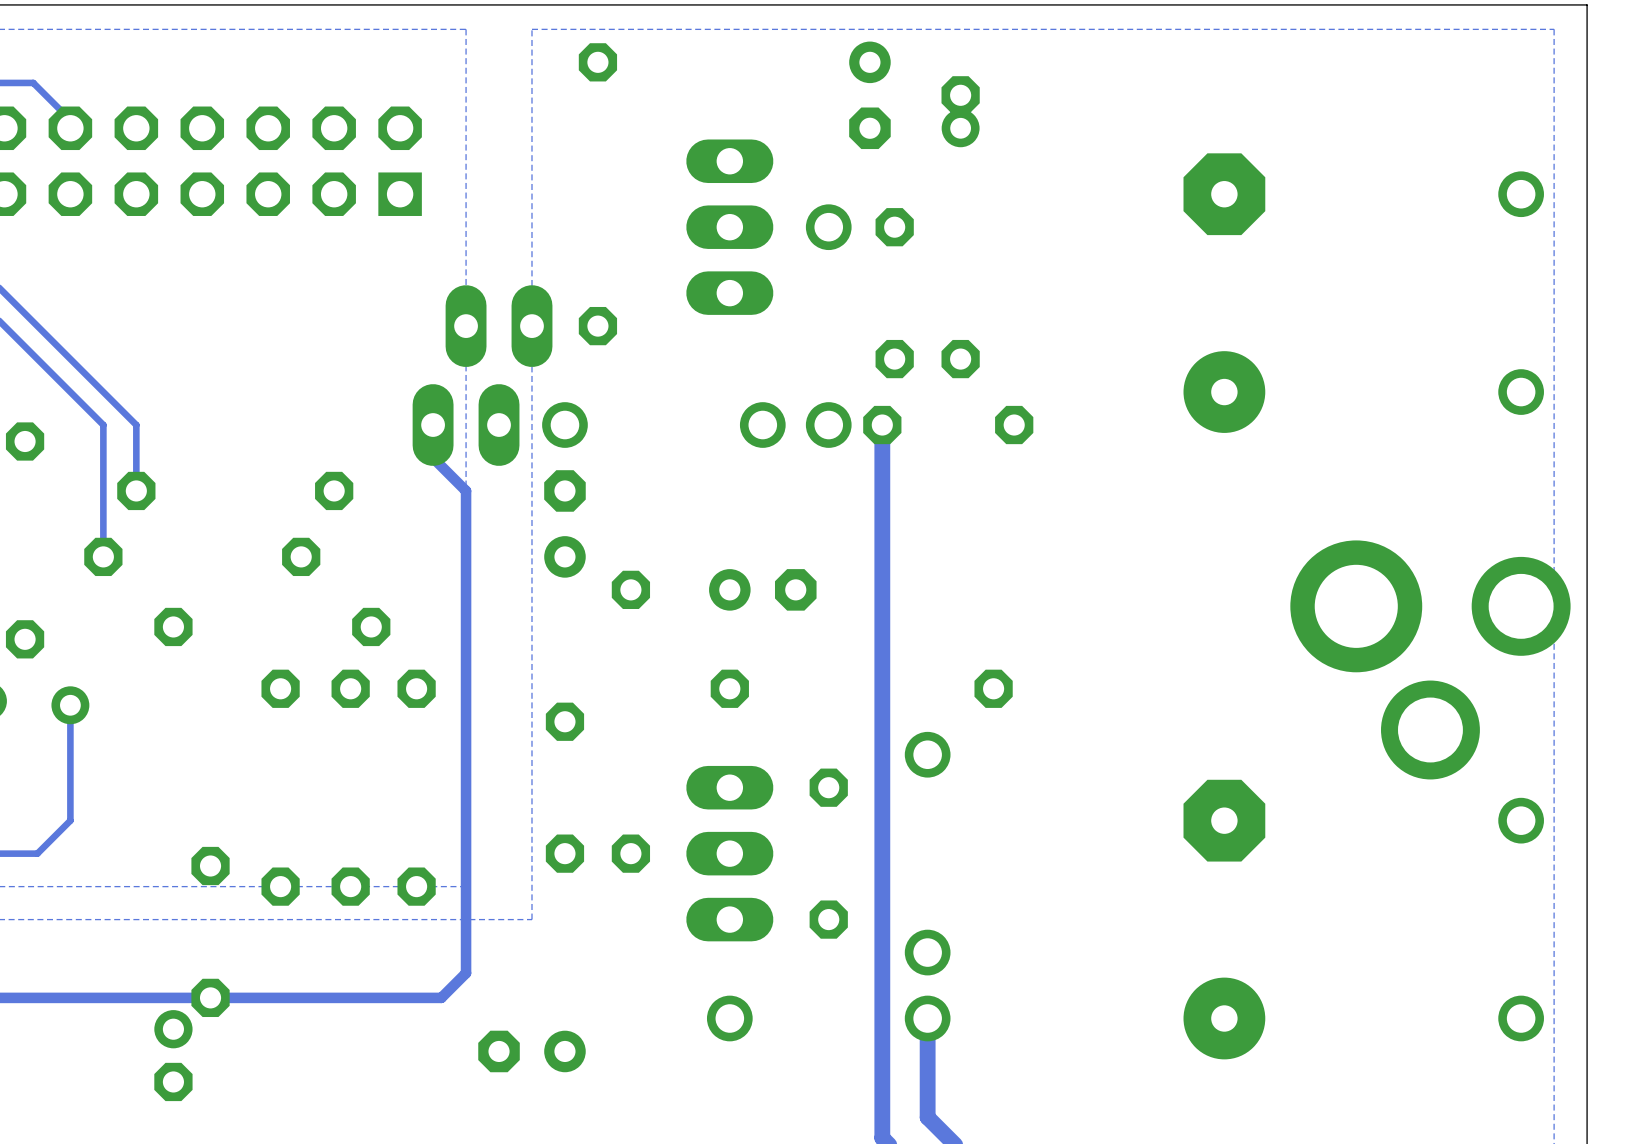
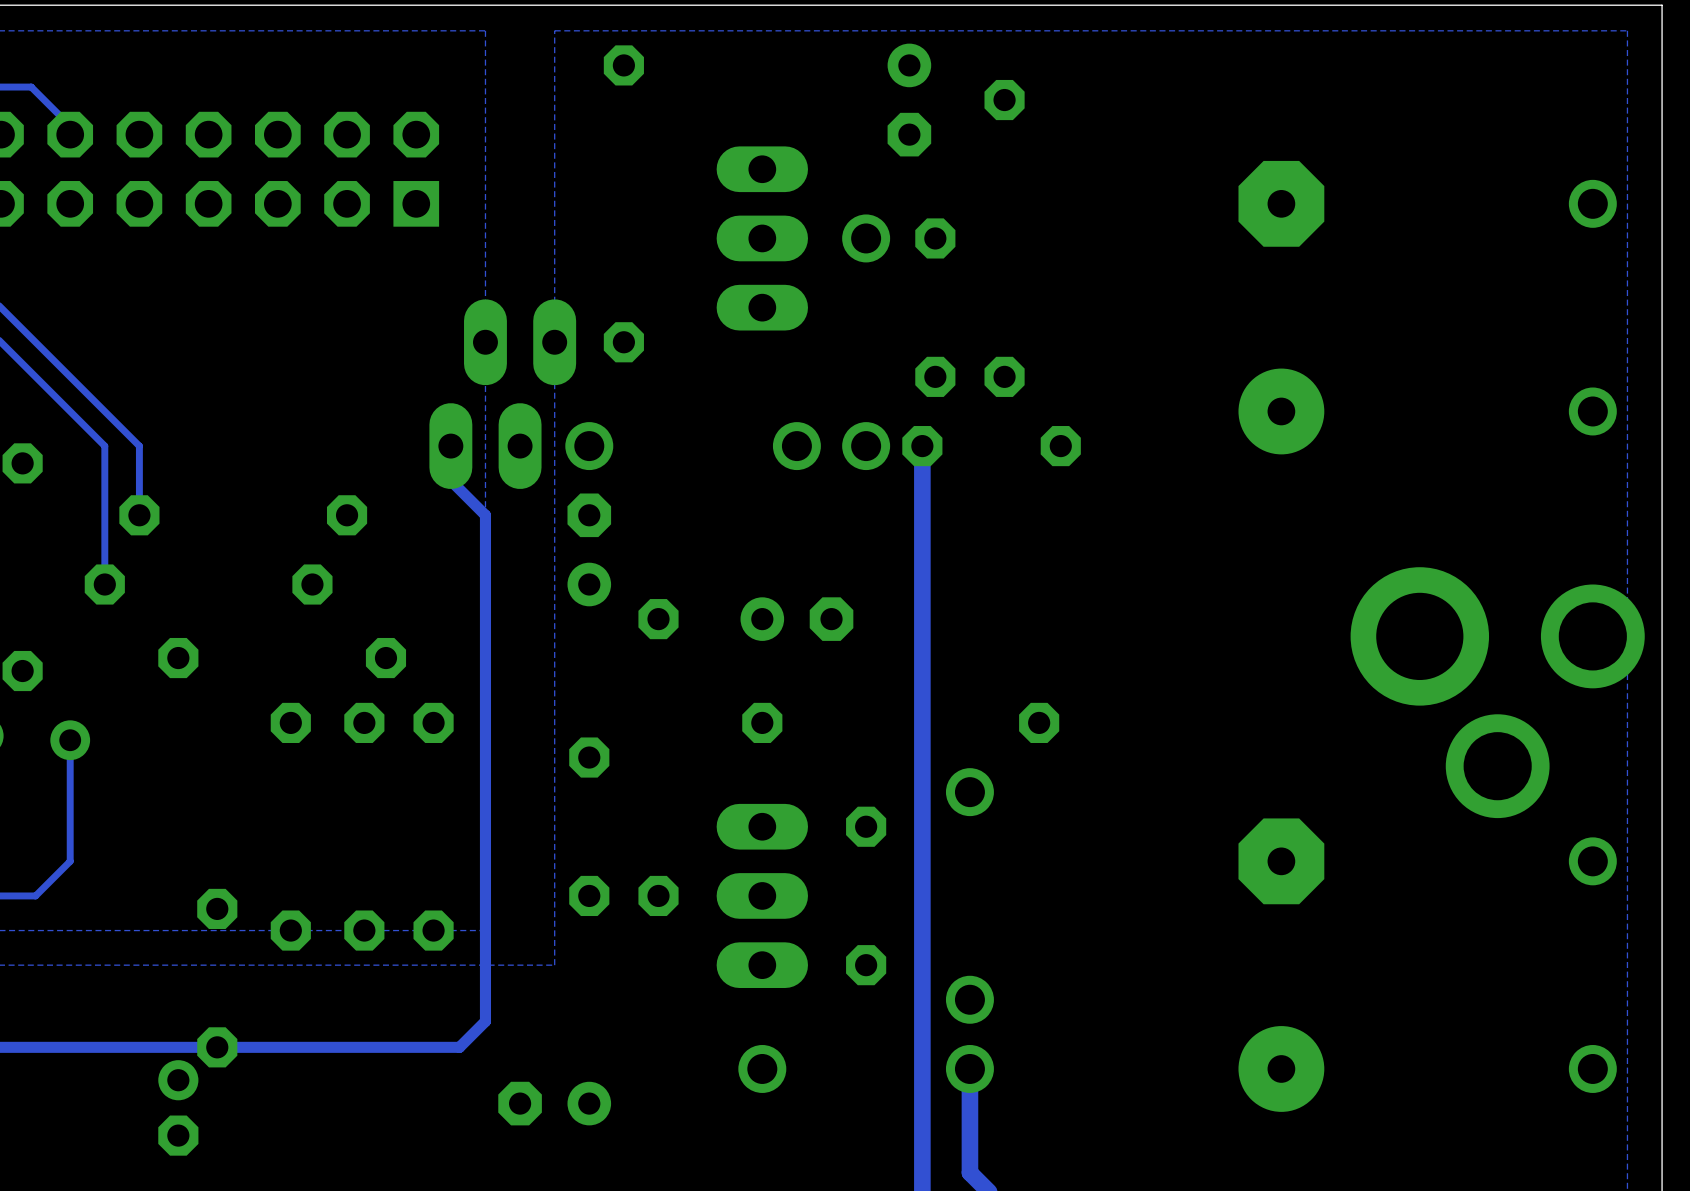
via: (960, 128) -> none

